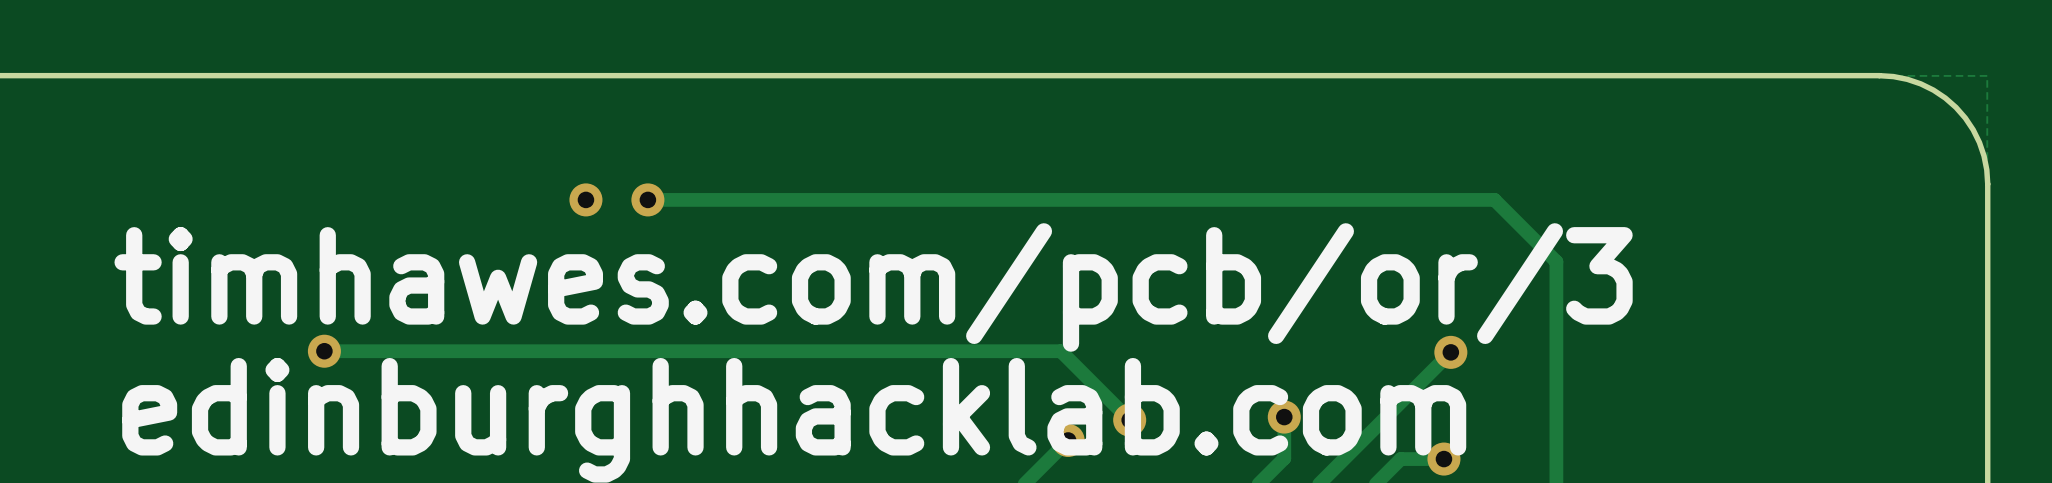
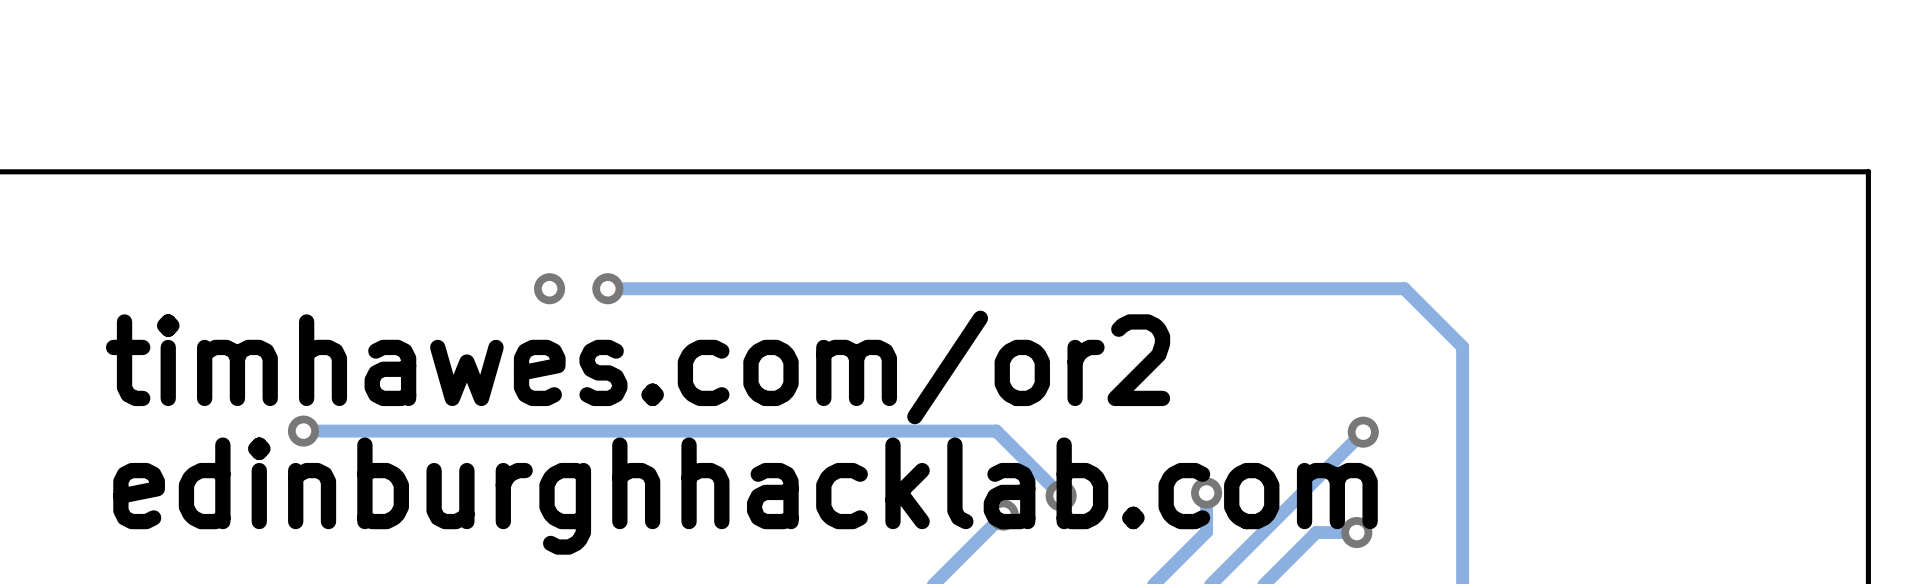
board edge: (1879, 75) (1907, 79) (1920, 83) (1945, 98) (1955, 107) (1965, 118) (1979, 142) (1984, 155) (1987, 184) -> (1766, 171) (1868, 171) (1868, 273)
text: timhawes.com/pcb/or/3 (873, 287) -> timhawes.com/or2 (638, 367)

